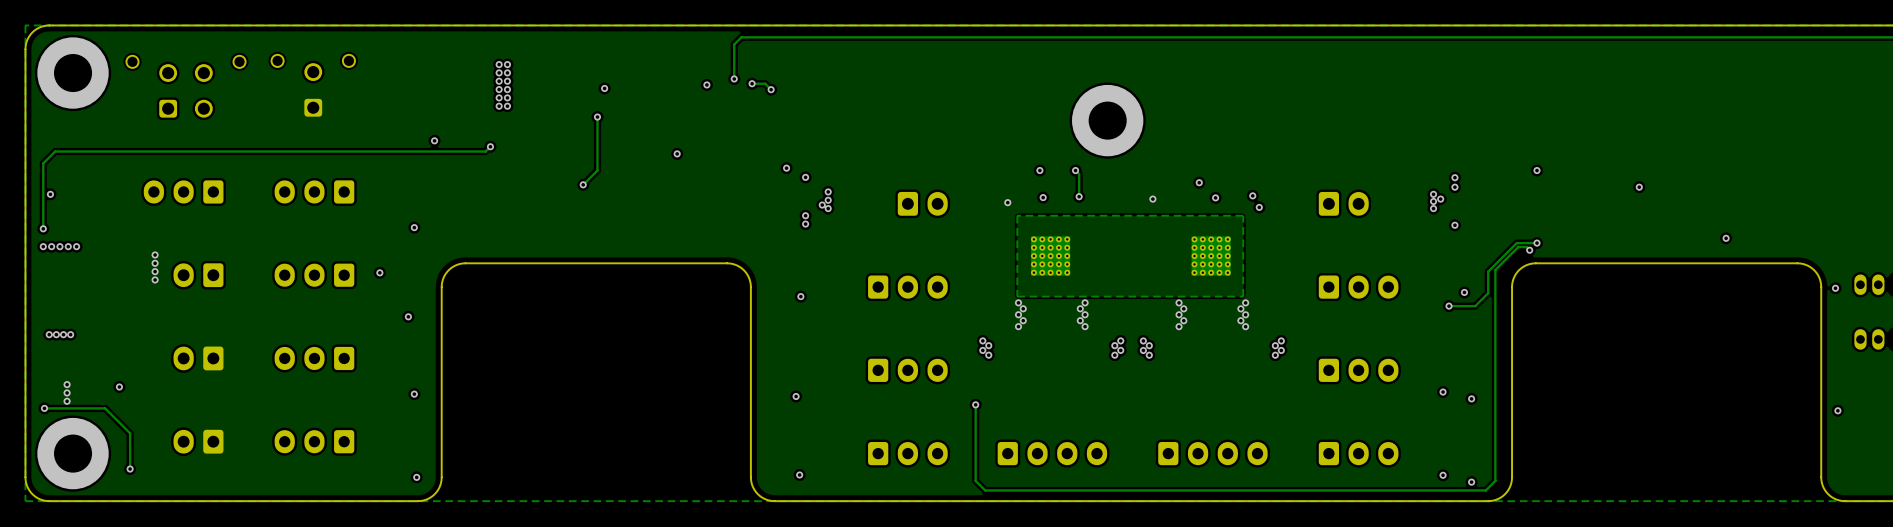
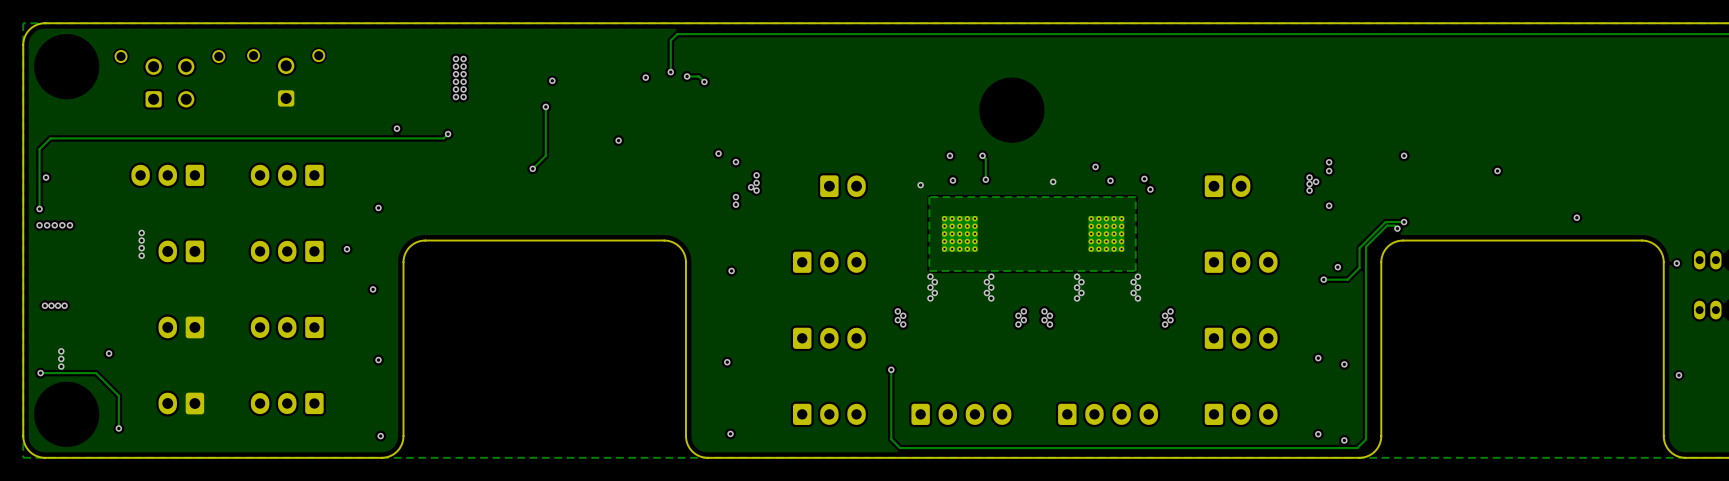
via: (73, 73) -> none
via: (1107, 120) -> none
via: (73, 453) -> none

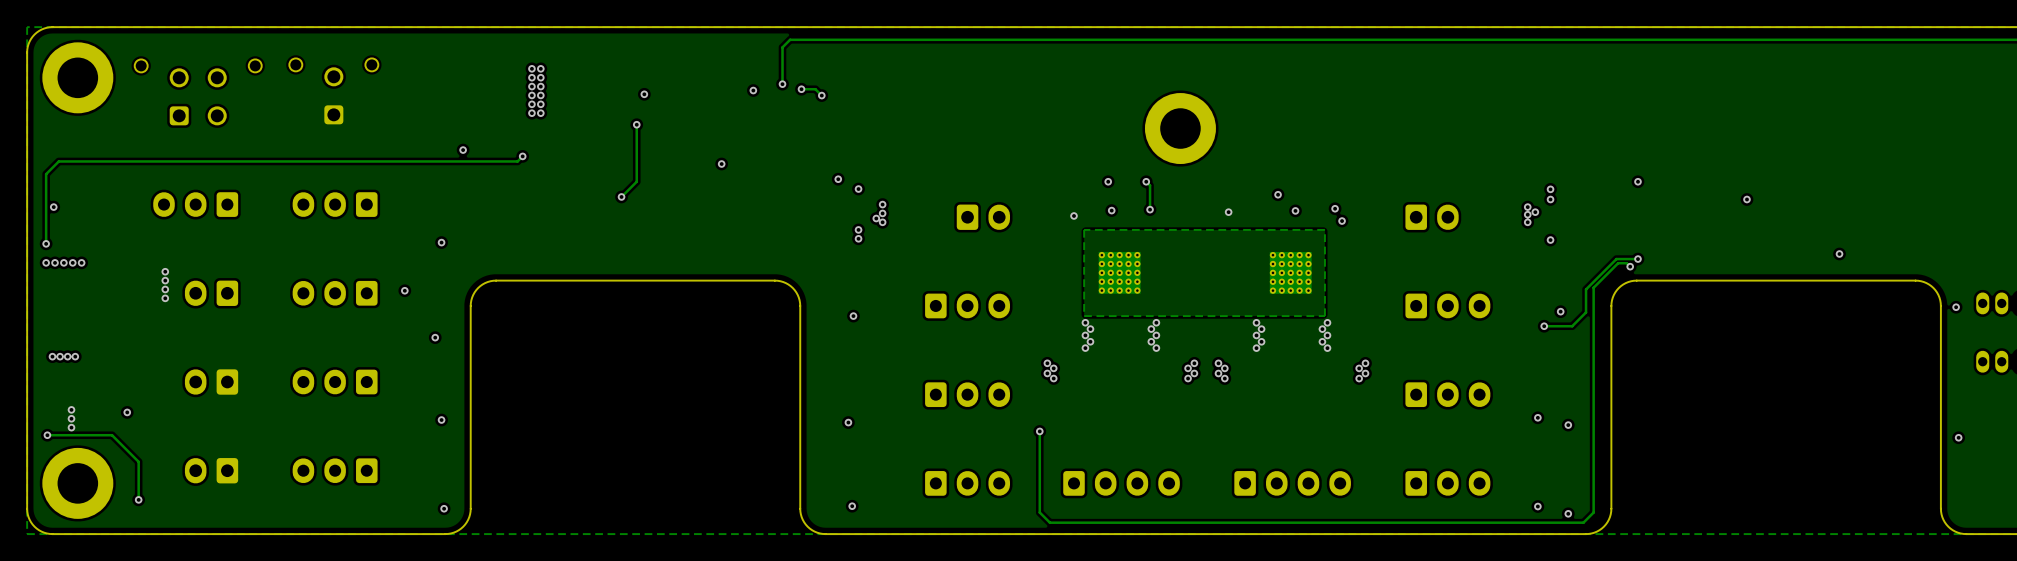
part: none -> (77, 77)
part: none -> (1180, 128)
part: none -> (77, 483)

